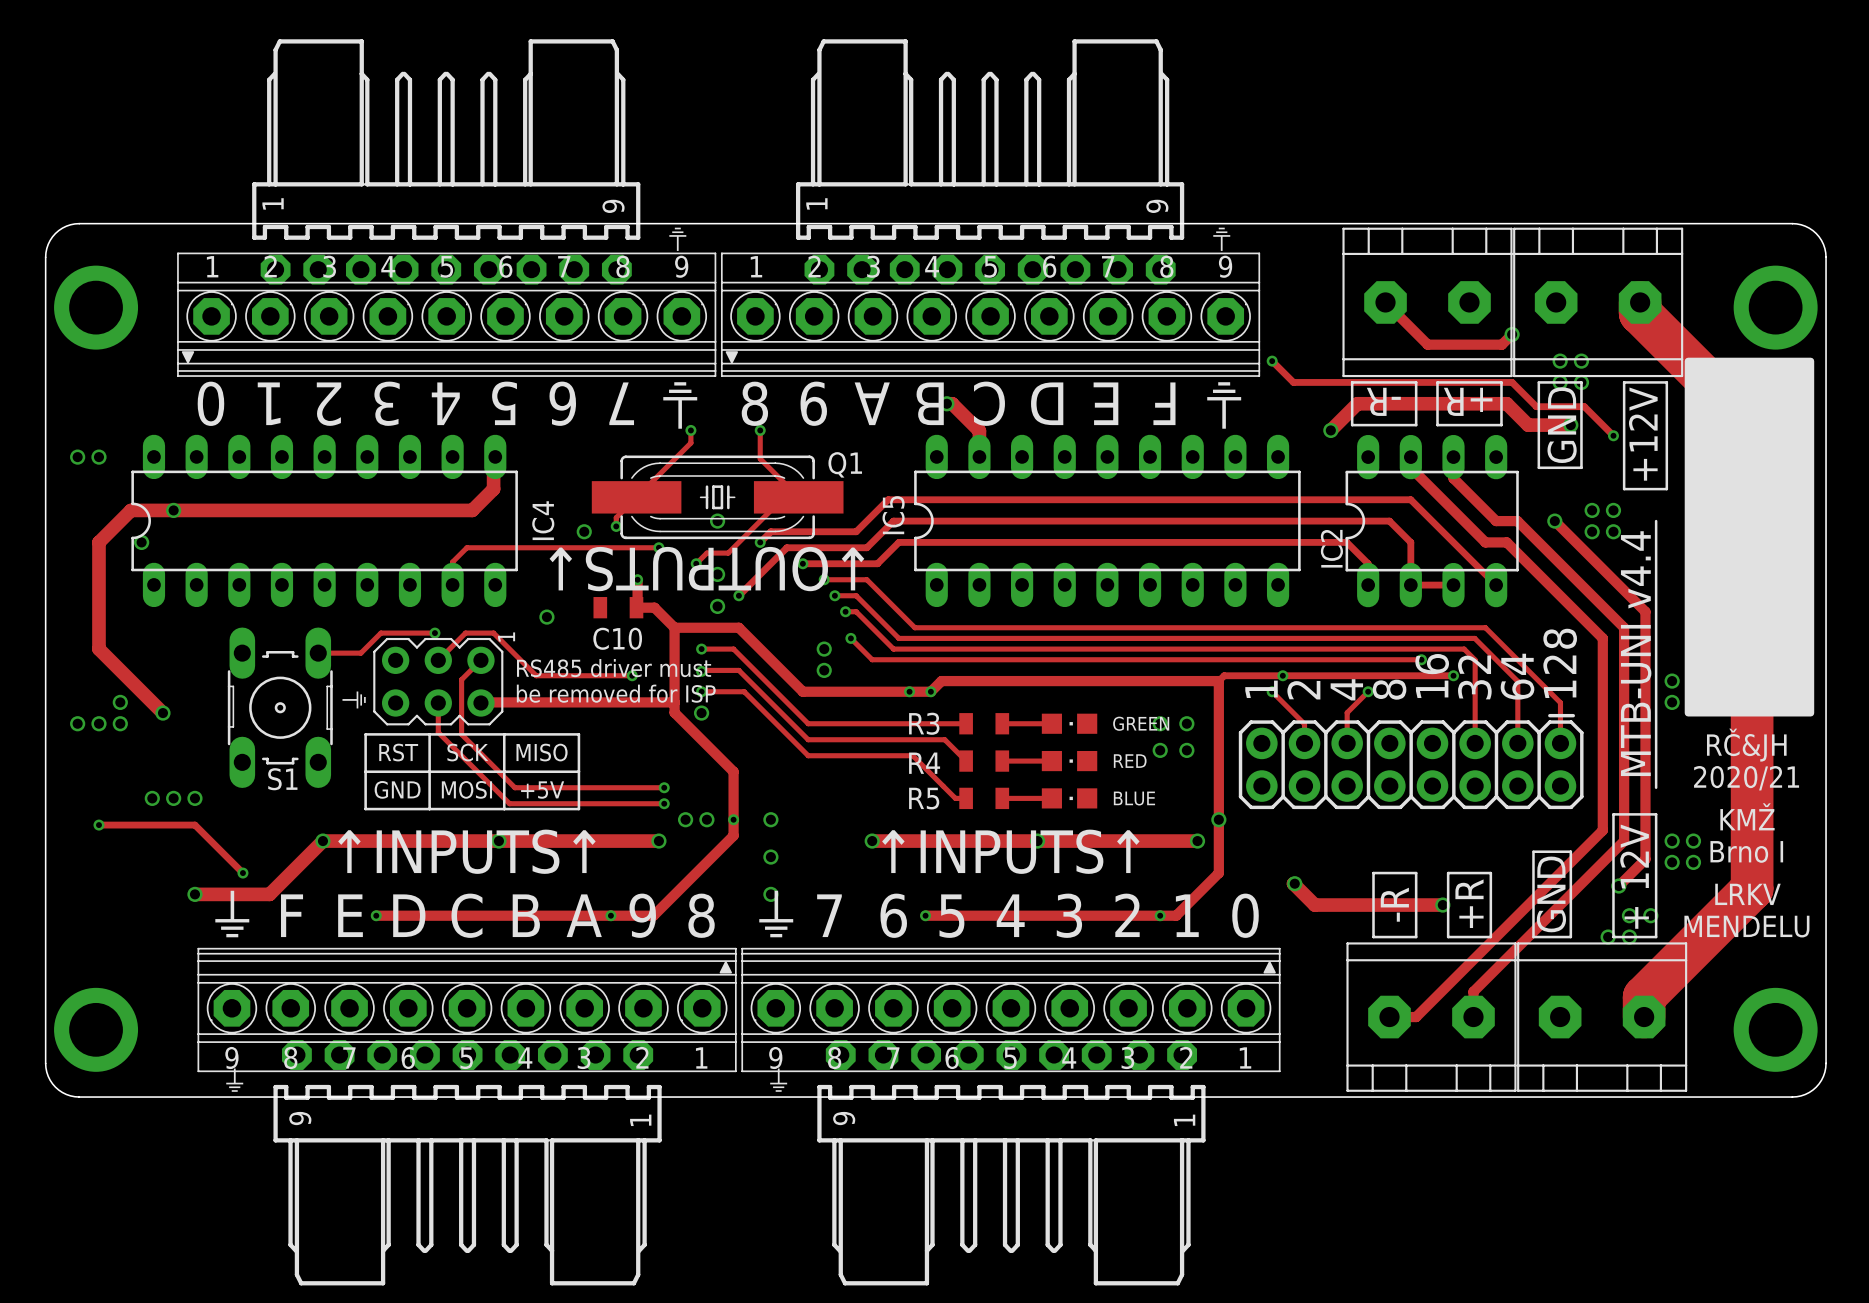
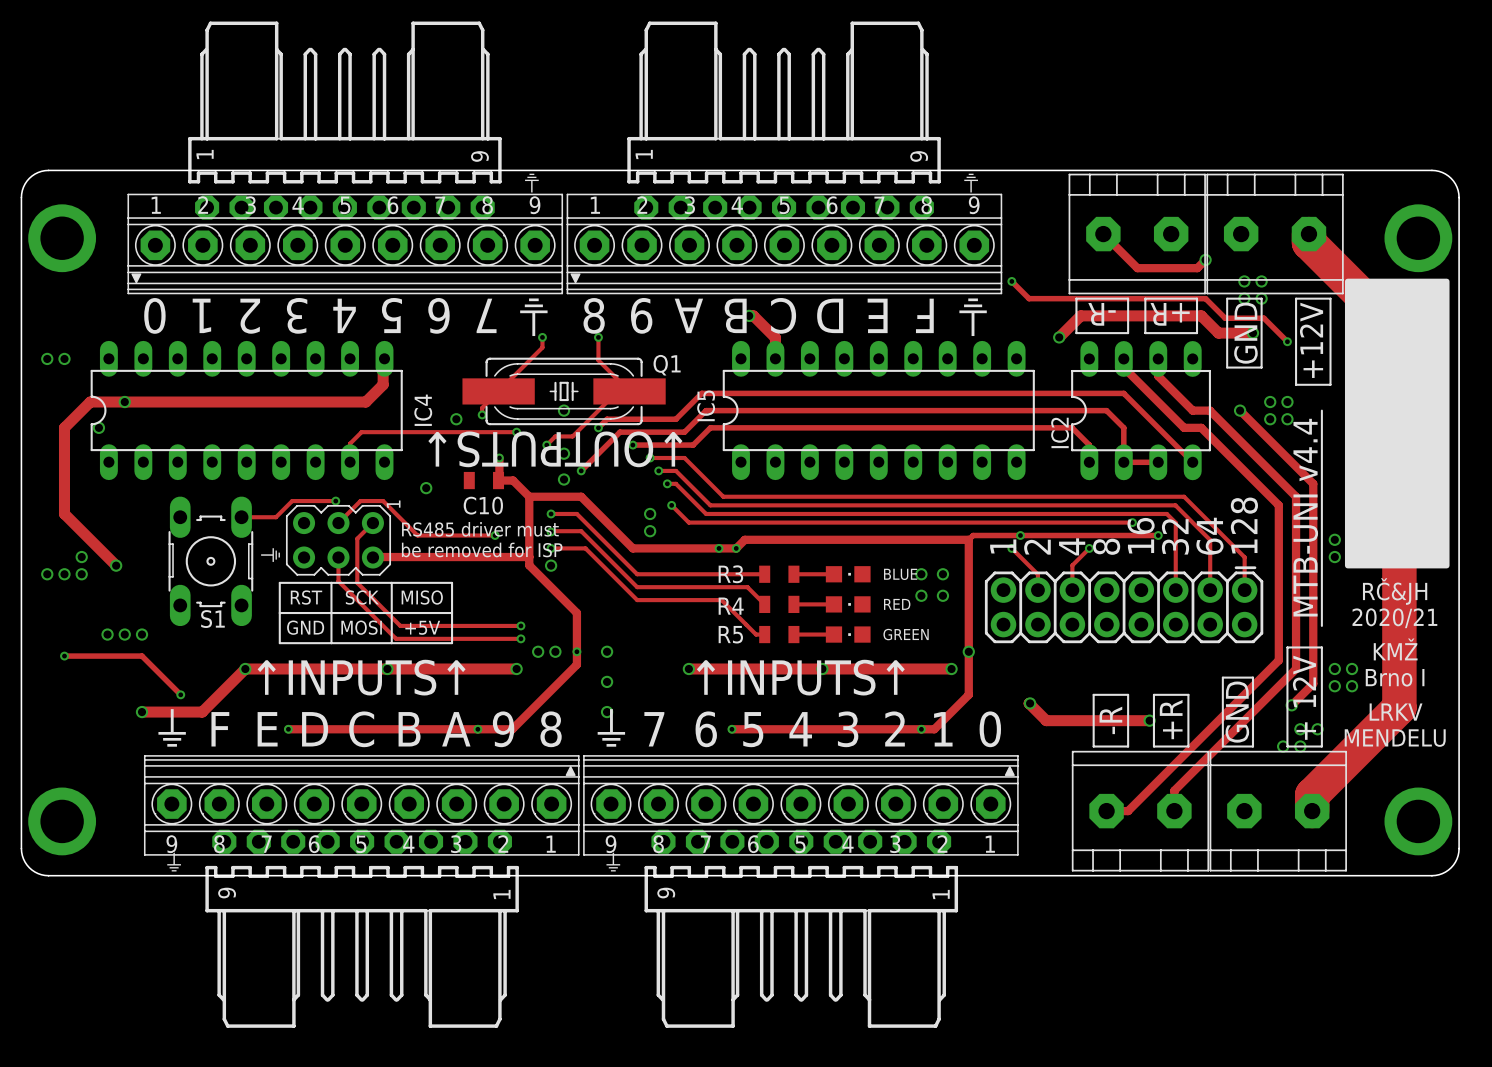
text: GREEN (1141, 723) -> BLUE (900, 574)
text: BLUE (1134, 798) -> GREEN (906, 634)

